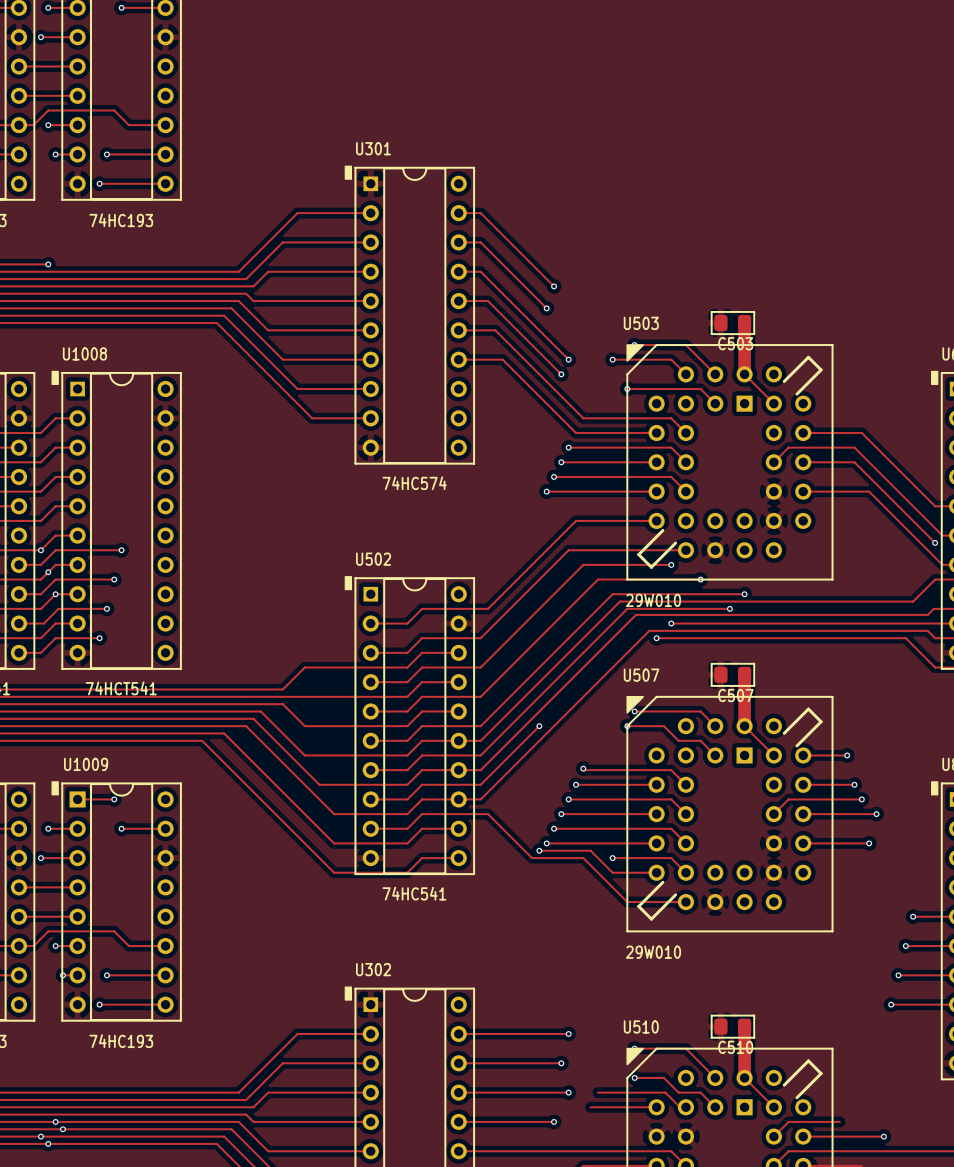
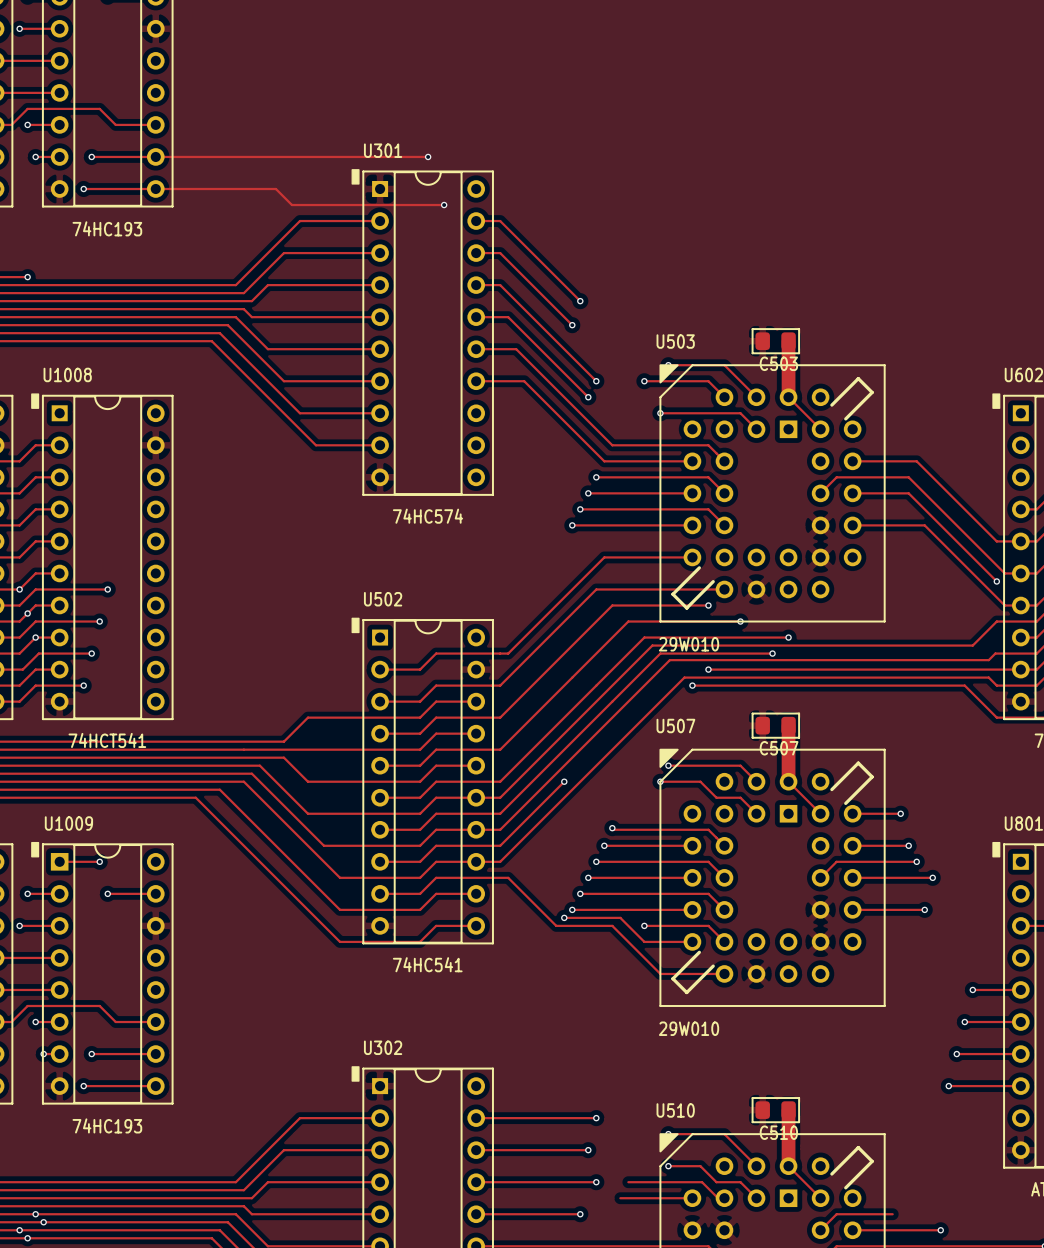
track: none -> (155, 156) (428, 156)
via: none -> (428, 156)
track: none -> (155, 189) (275, 189) (291, 205) (444, 205)
via: none -> (444, 205)

